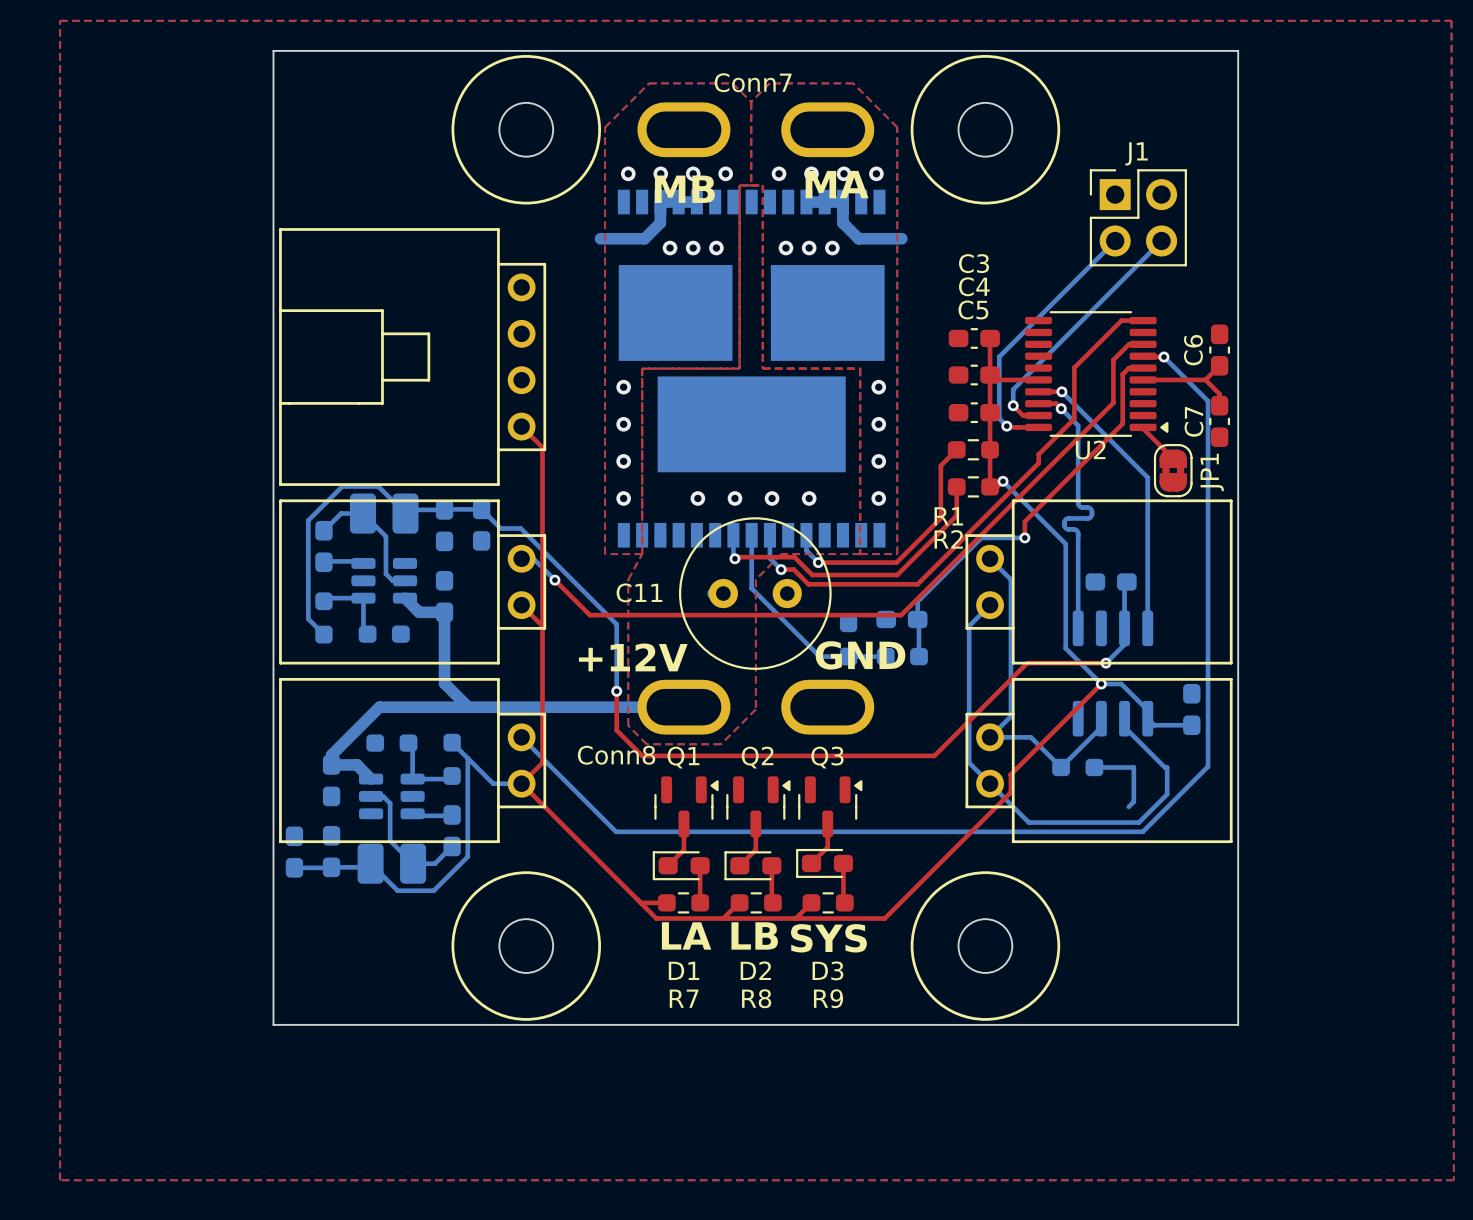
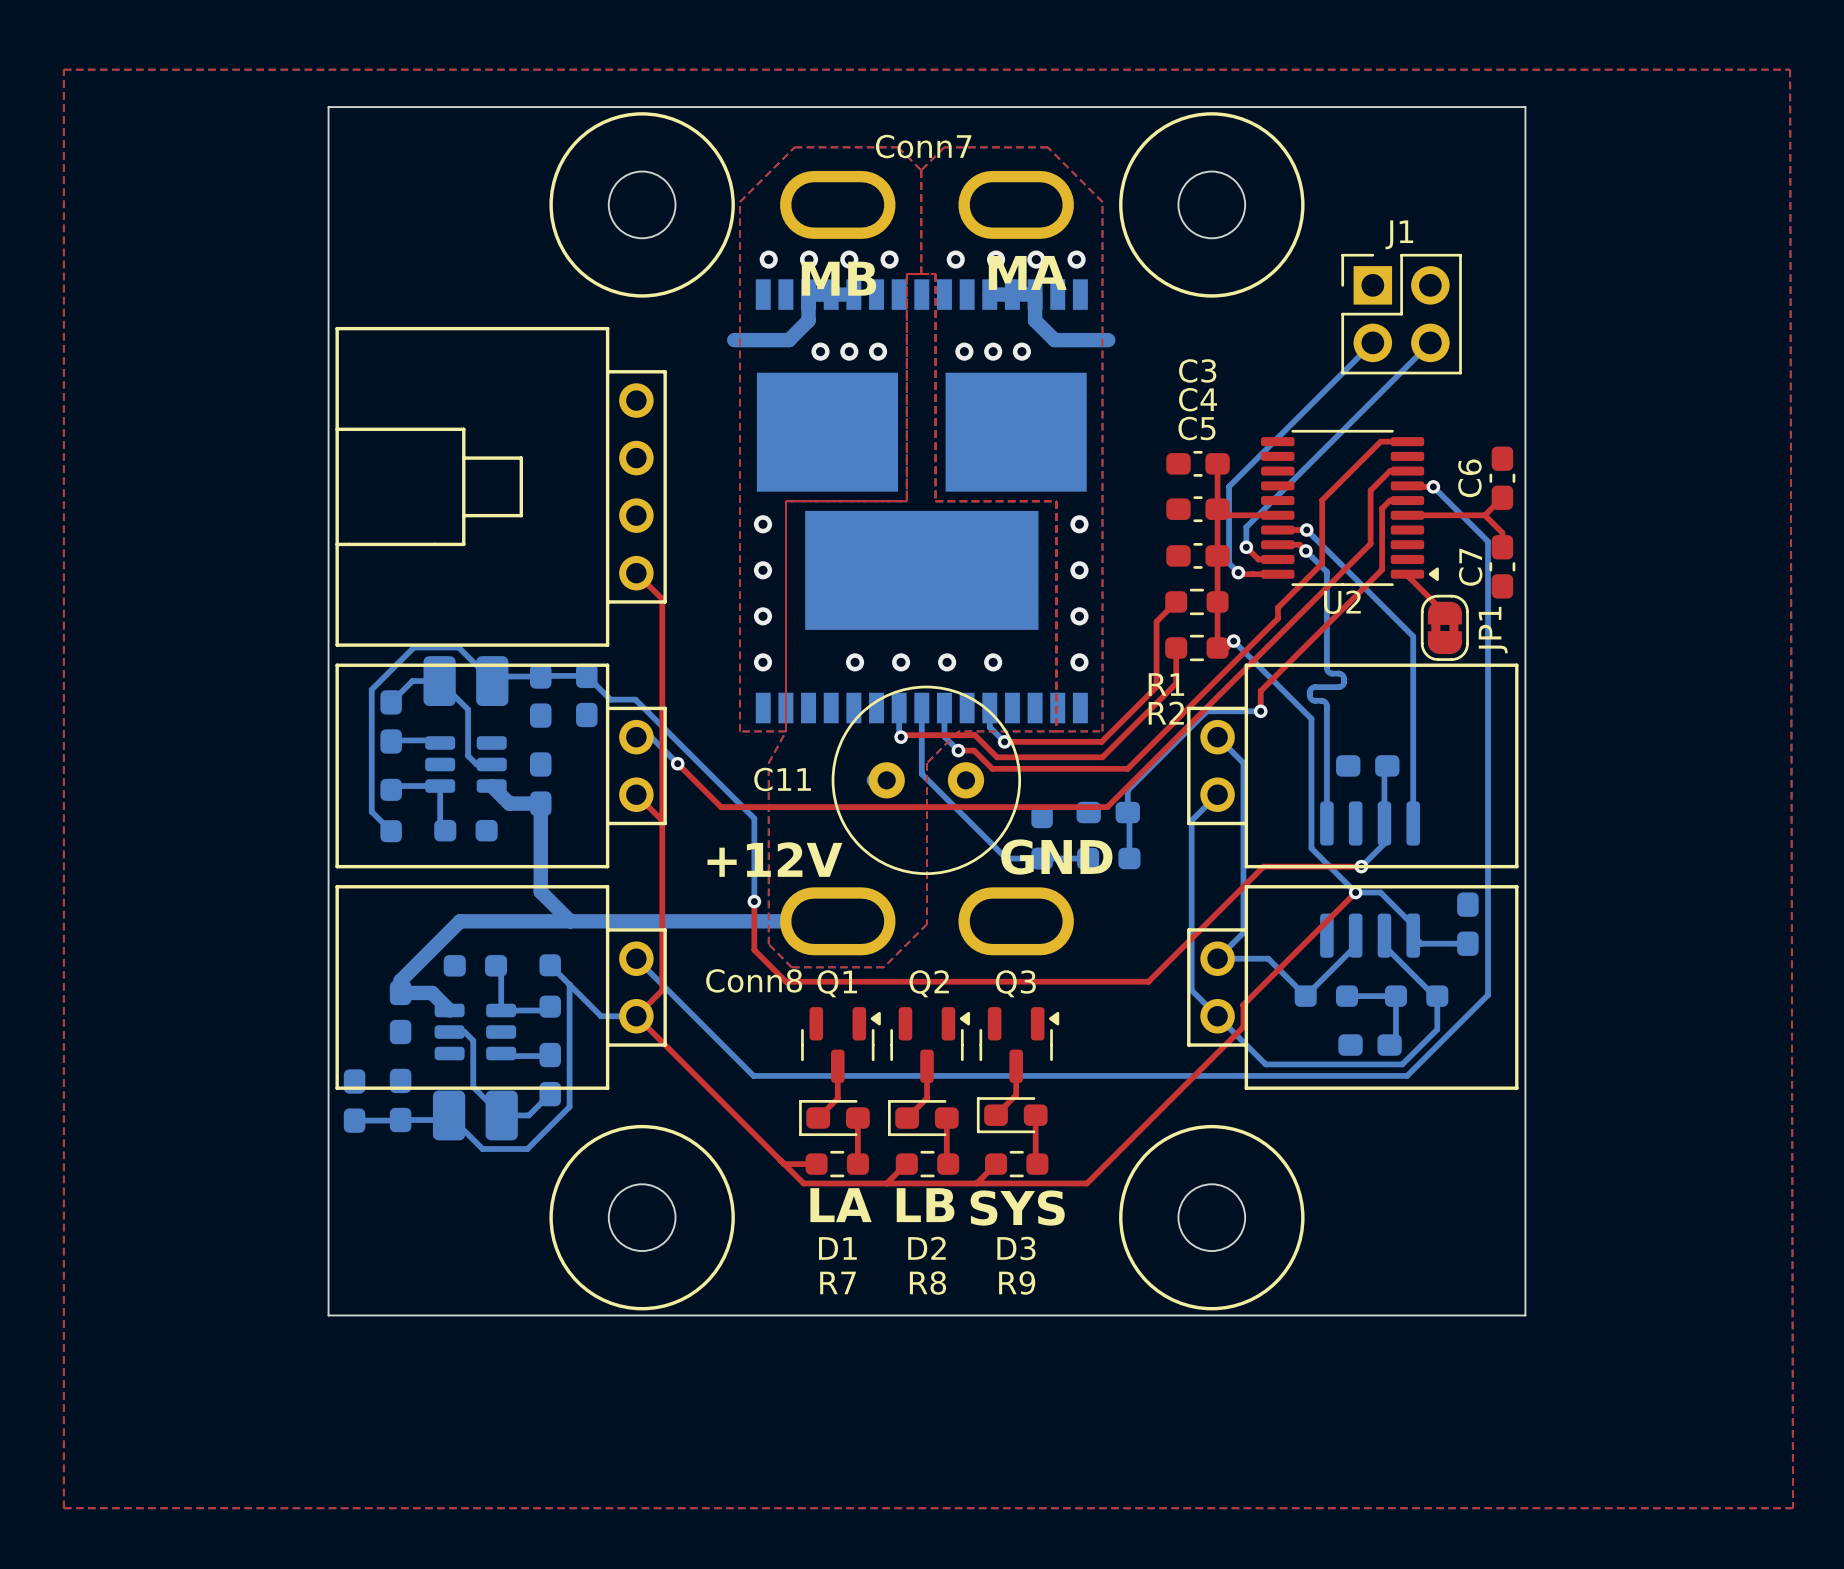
part: none -> (1416, 996)
part: none -> (1370, 1045)

